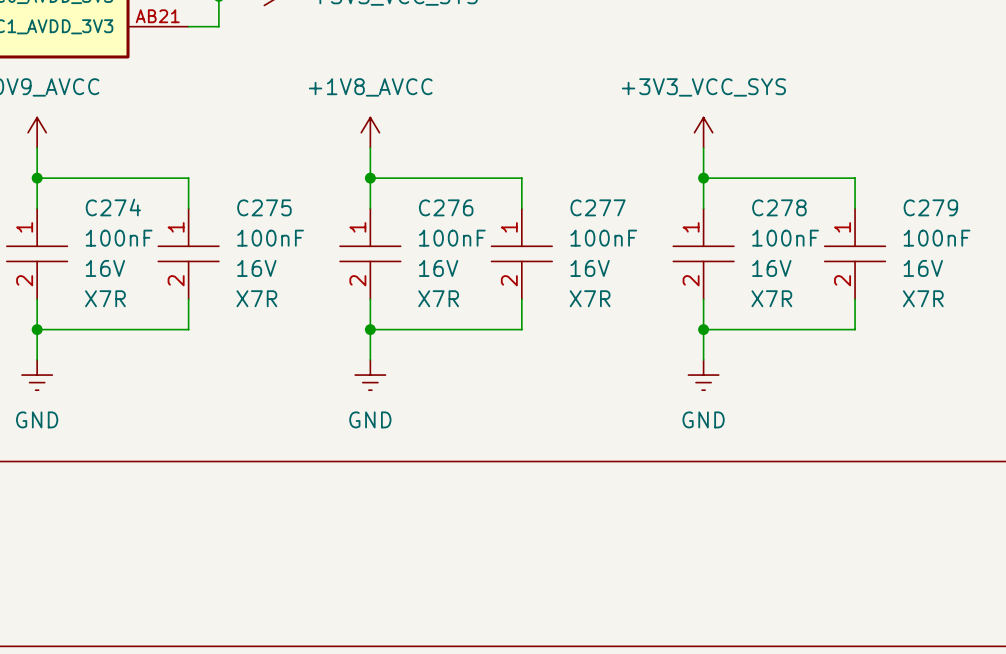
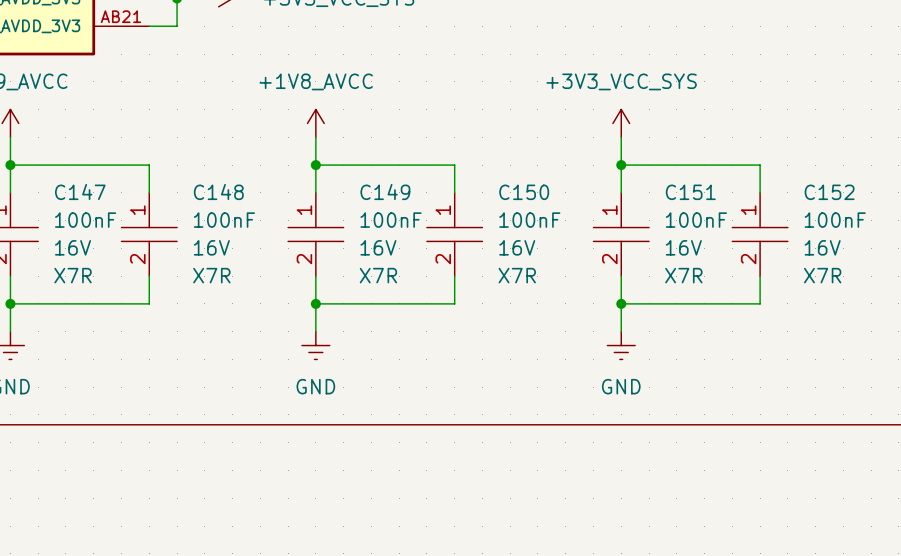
C274 name: C274 (113, 207) -> C147 (80, 191)
C275 name: C275 (264, 207) -> C148 (218, 191)
C276 name: C276 (446, 207) -> C149 (385, 191)
C277 name: C277 (598, 207) -> C150 (524, 192)
C278 name: C278 (779, 207) -> C151 (690, 192)
C279 name: C279 (930, 207) -> C152 (829, 192)

